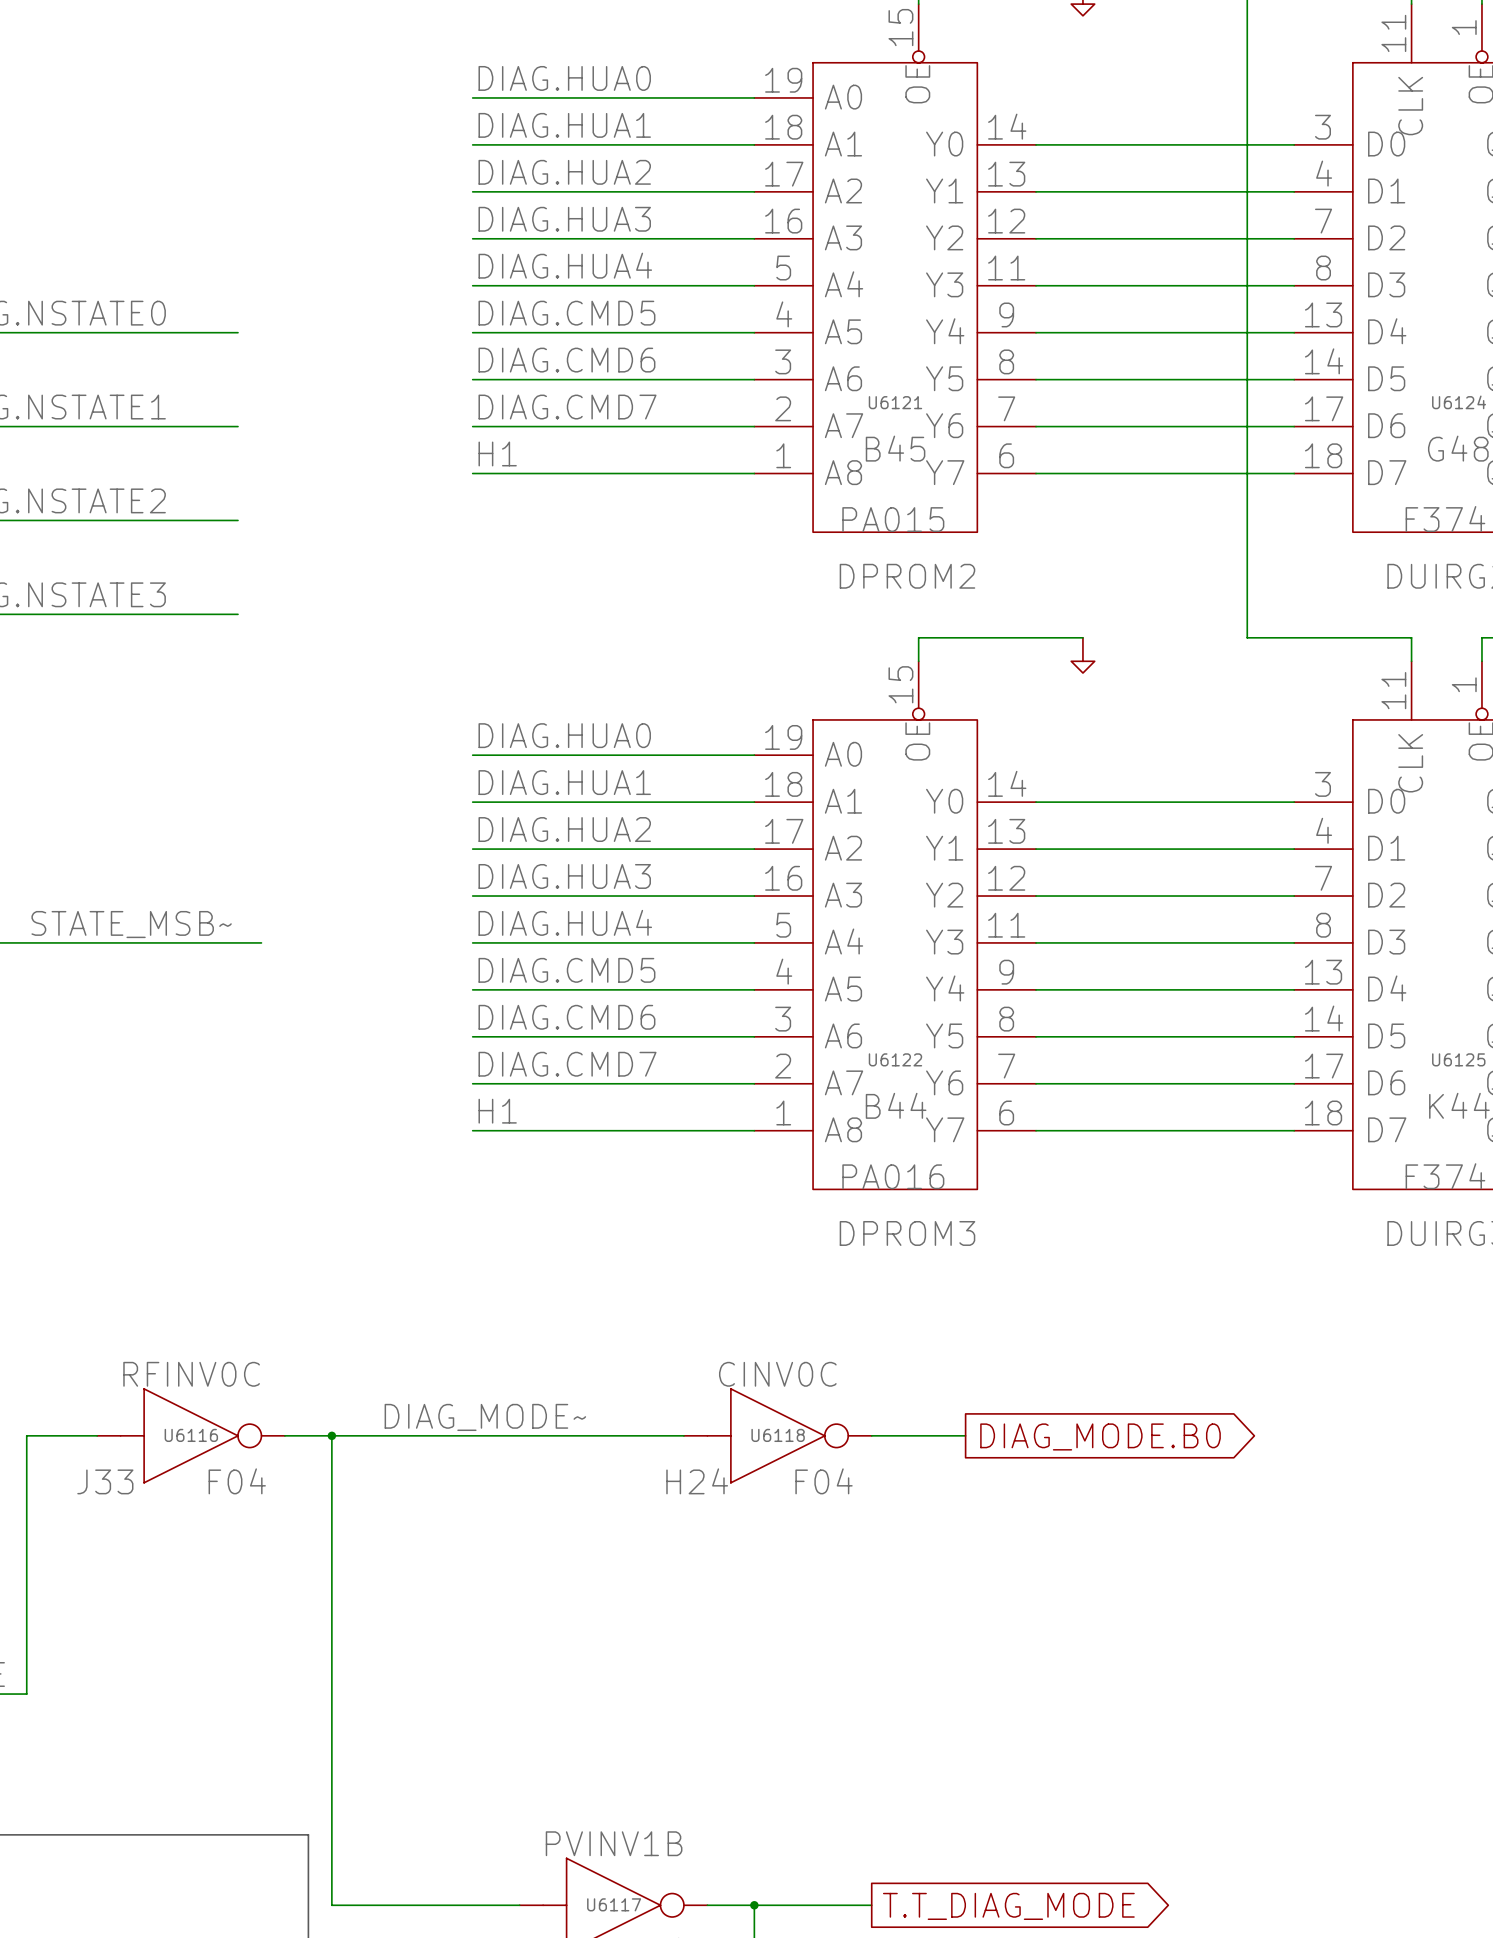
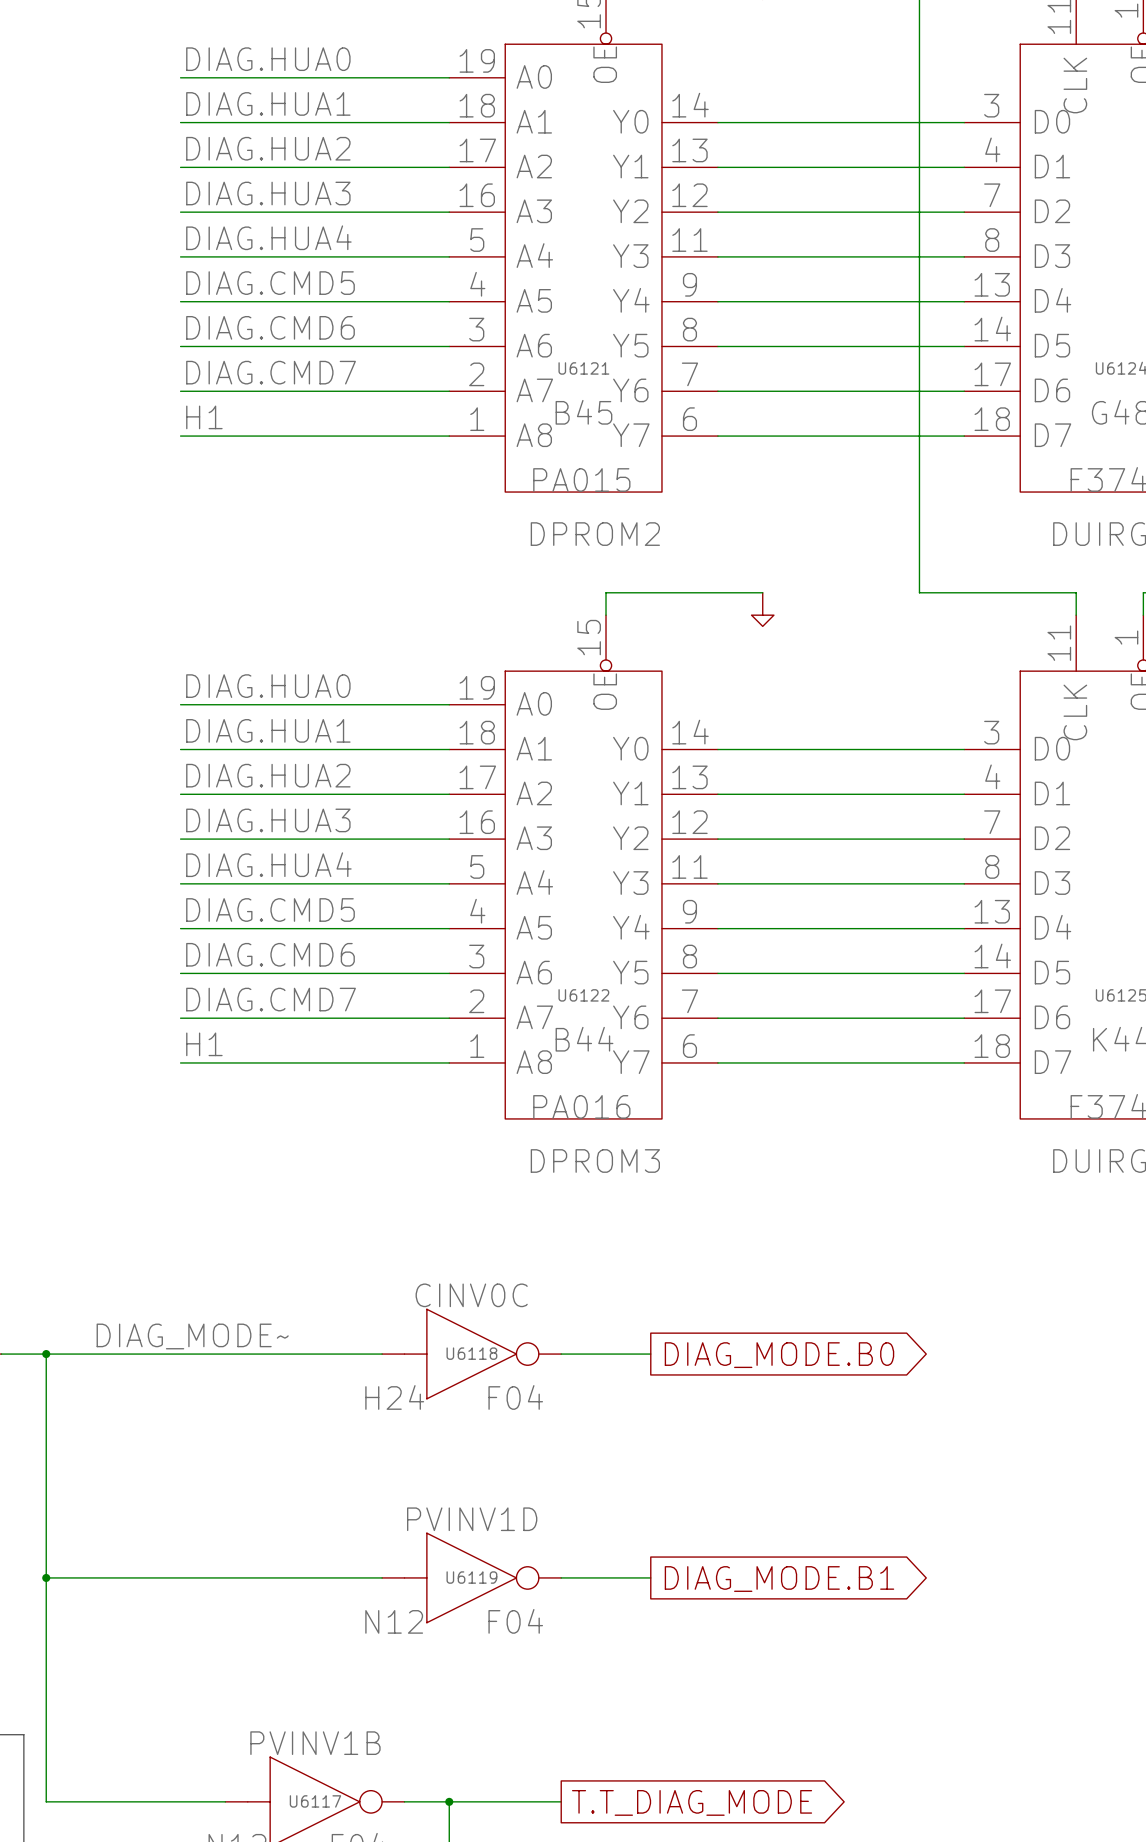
wire: none -> (46, 1577) (382, 1577)
junction: none -> (46, 1577)
U6119: none -> F04 (471, 1577)
wire: none -> (561, 1577) (650, 1577)
global label: none -> DIAG_MODE.B1 (779, 1579)

